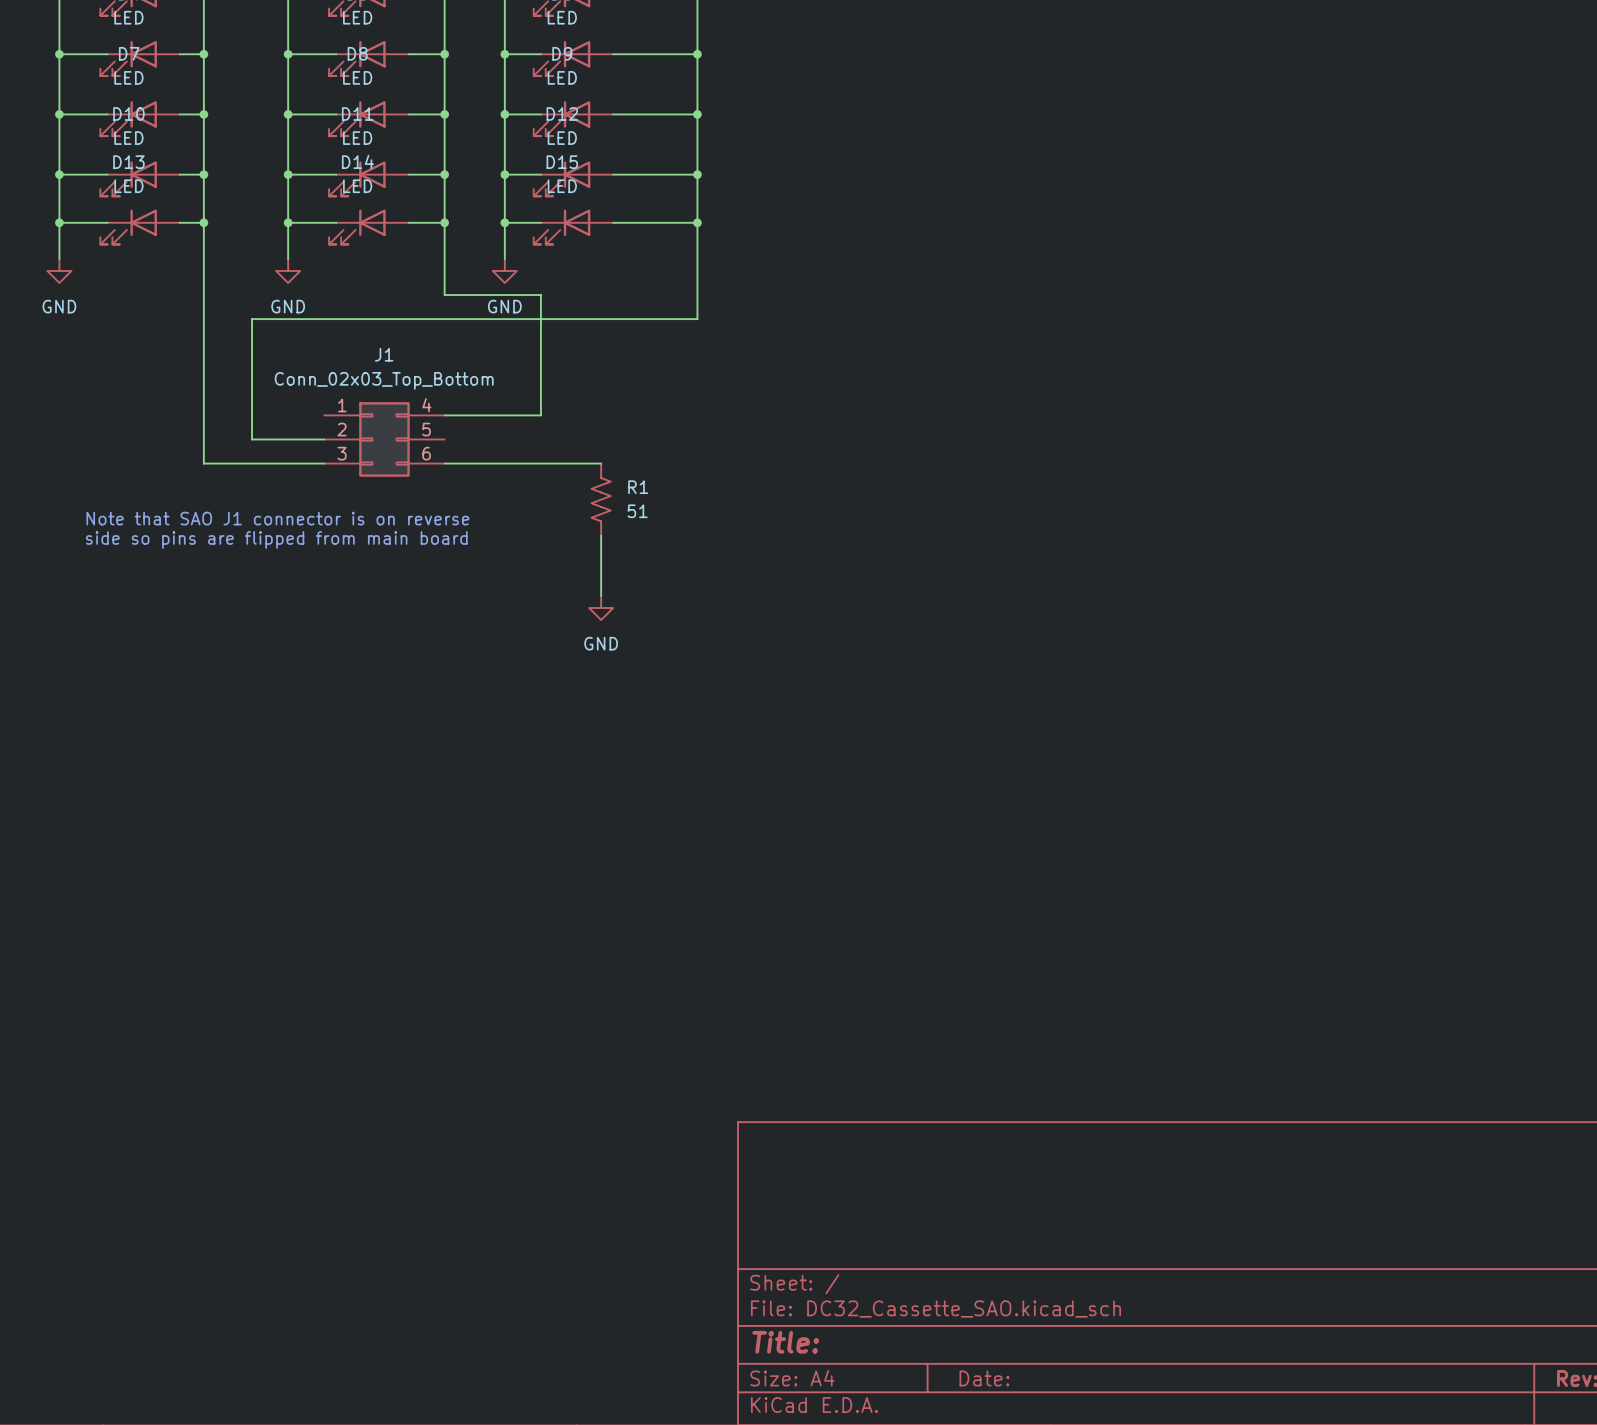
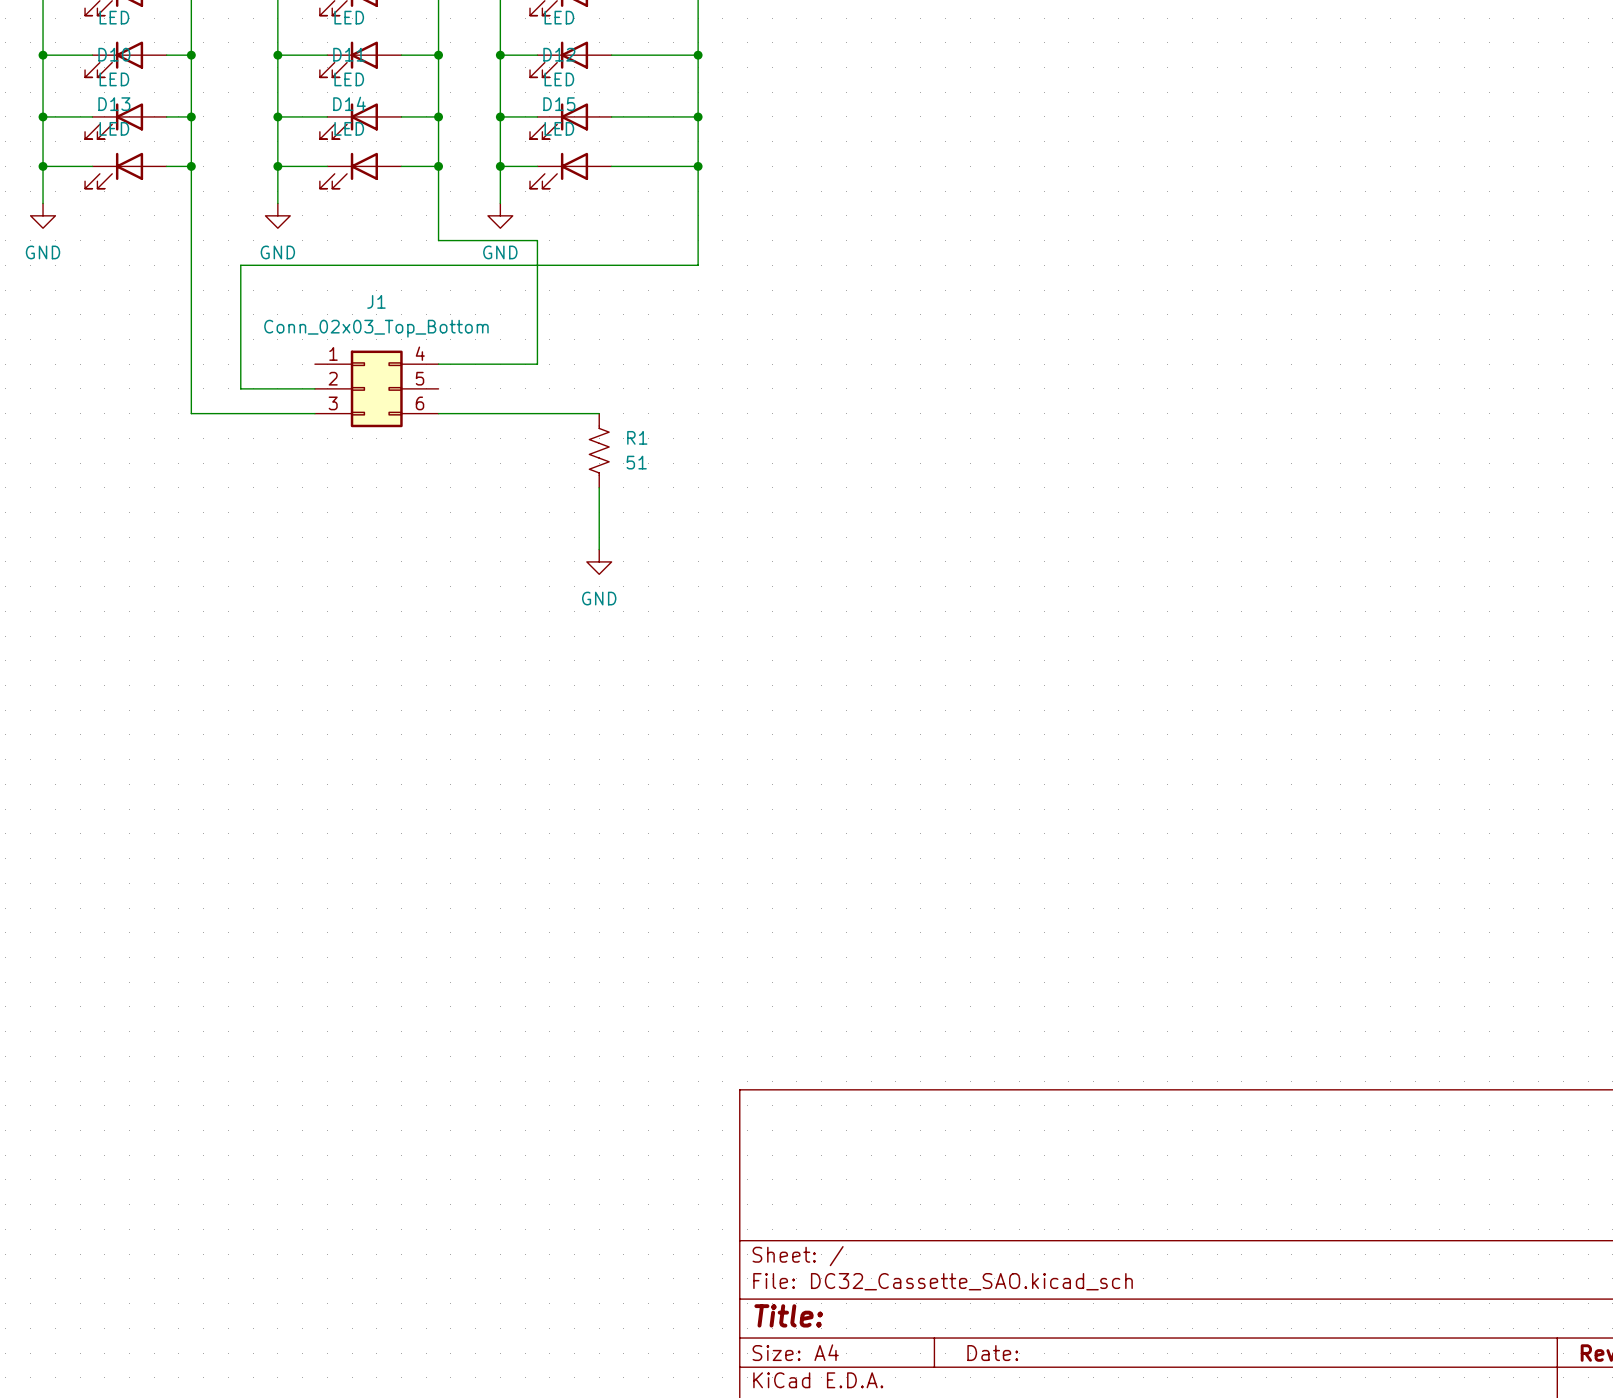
text: Note that SAO J1 connector is on reverse (277, 518) -> none
text: side so pins are flipped from main board (276, 539) -> none

